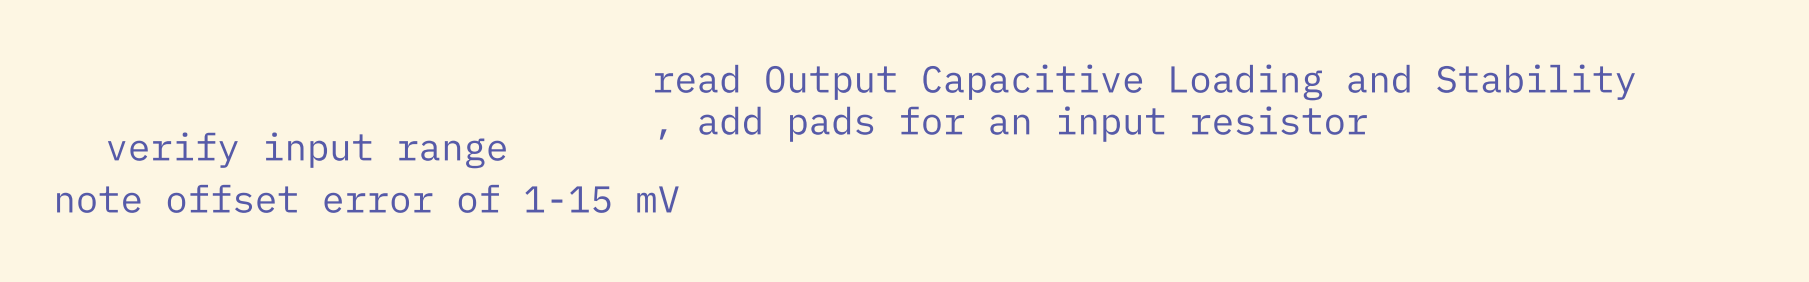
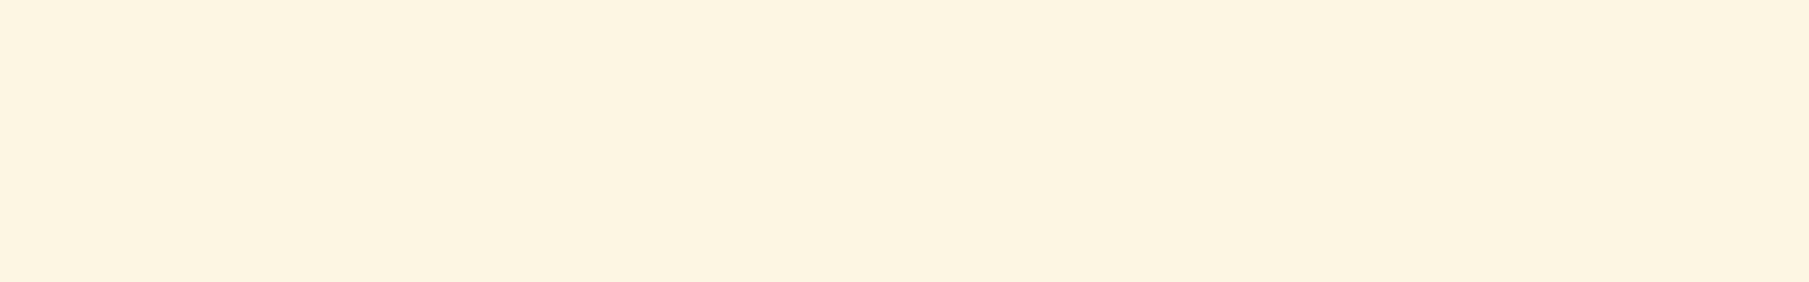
text: read Output Capacitive Loading and Stability (1145, 82) -> none
text: , add pads for an input resistor (1013, 124) -> none
text: verify input range (306, 150) -> none
text: note offset error of 1-15 mV (367, 198) -> none

